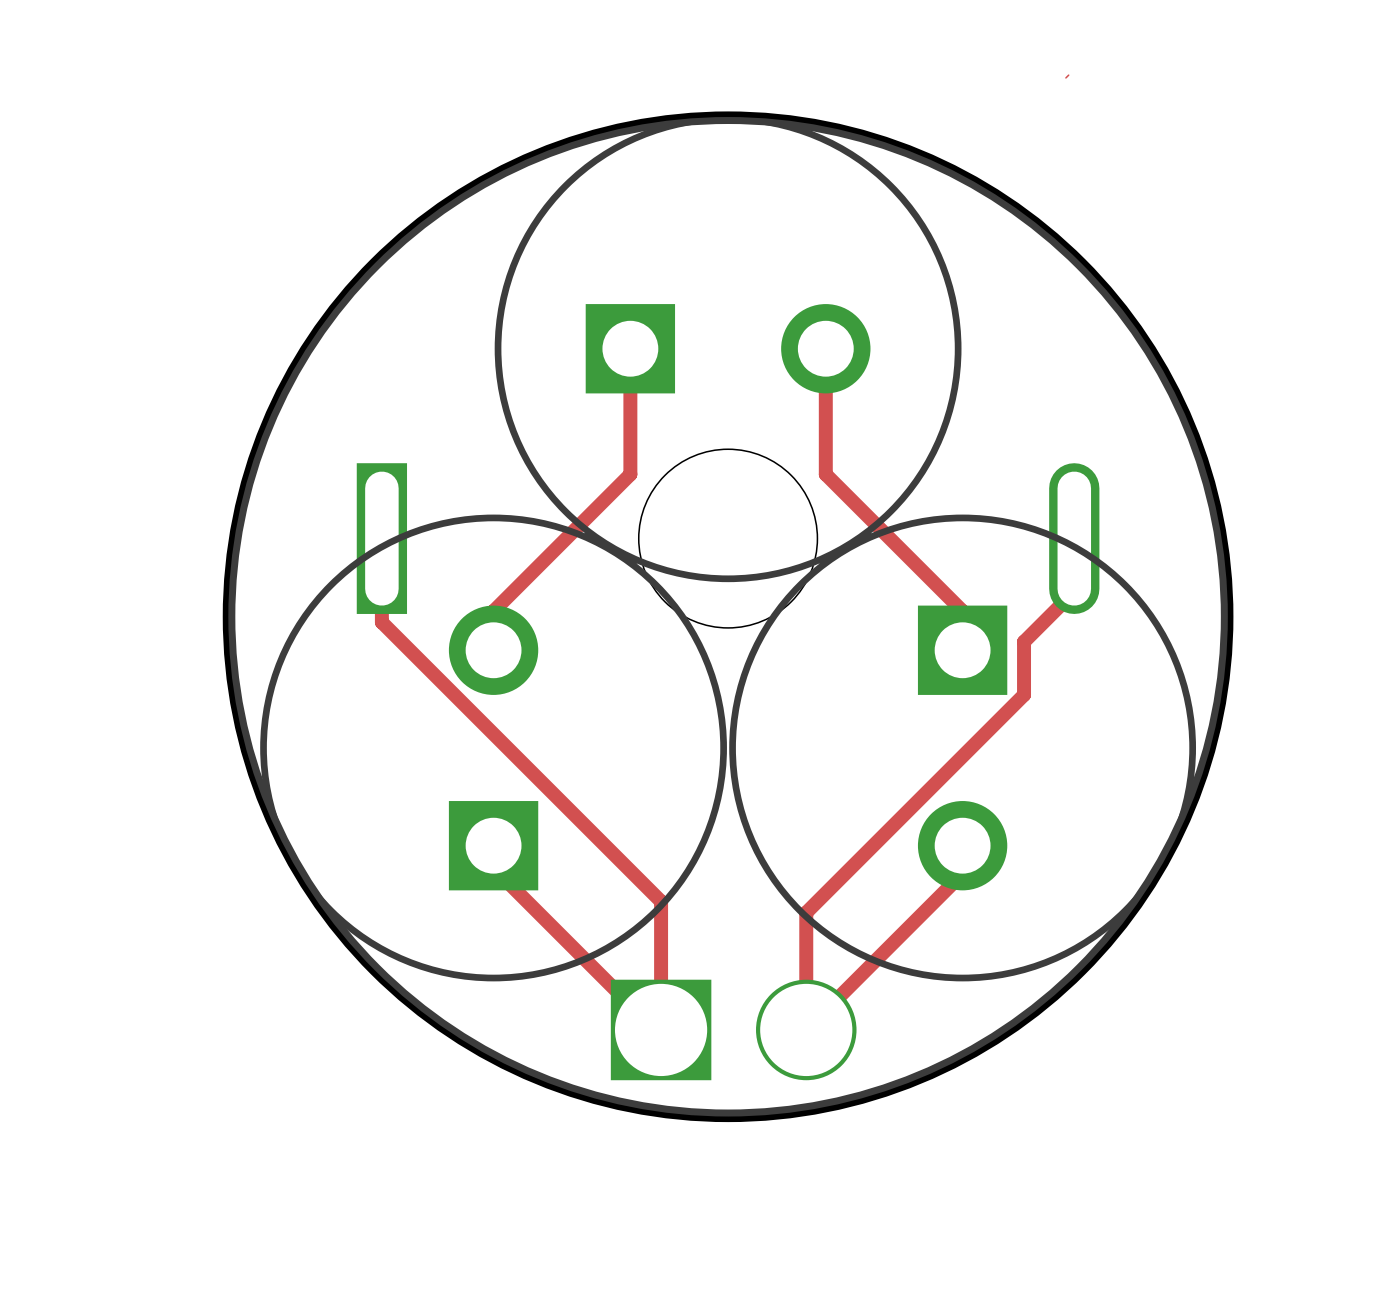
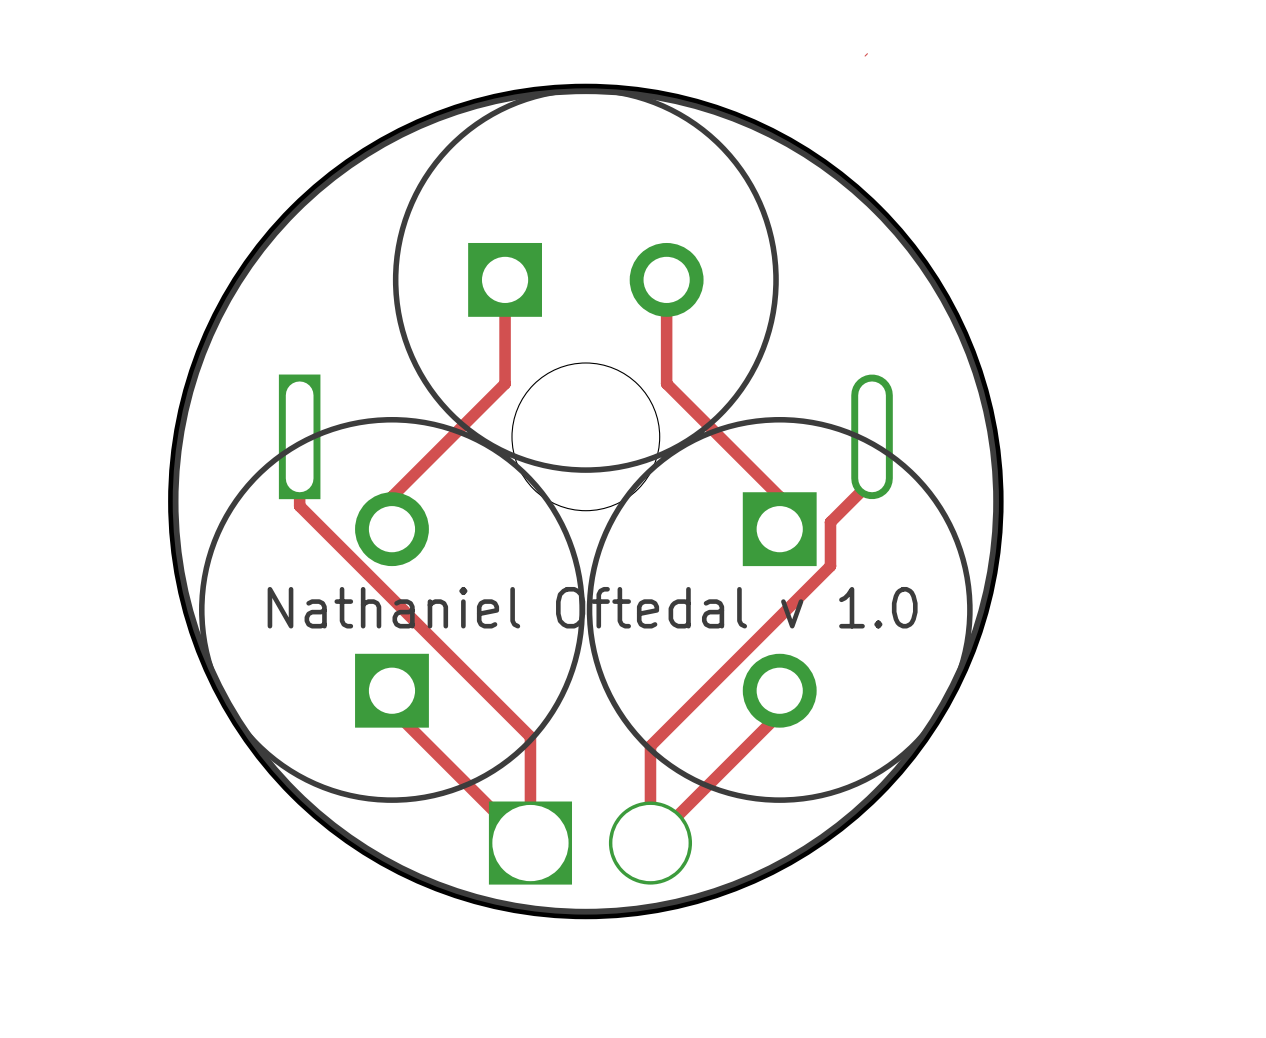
text: none -> Nathaniel Oftedal v 1.0 (592, 607)

